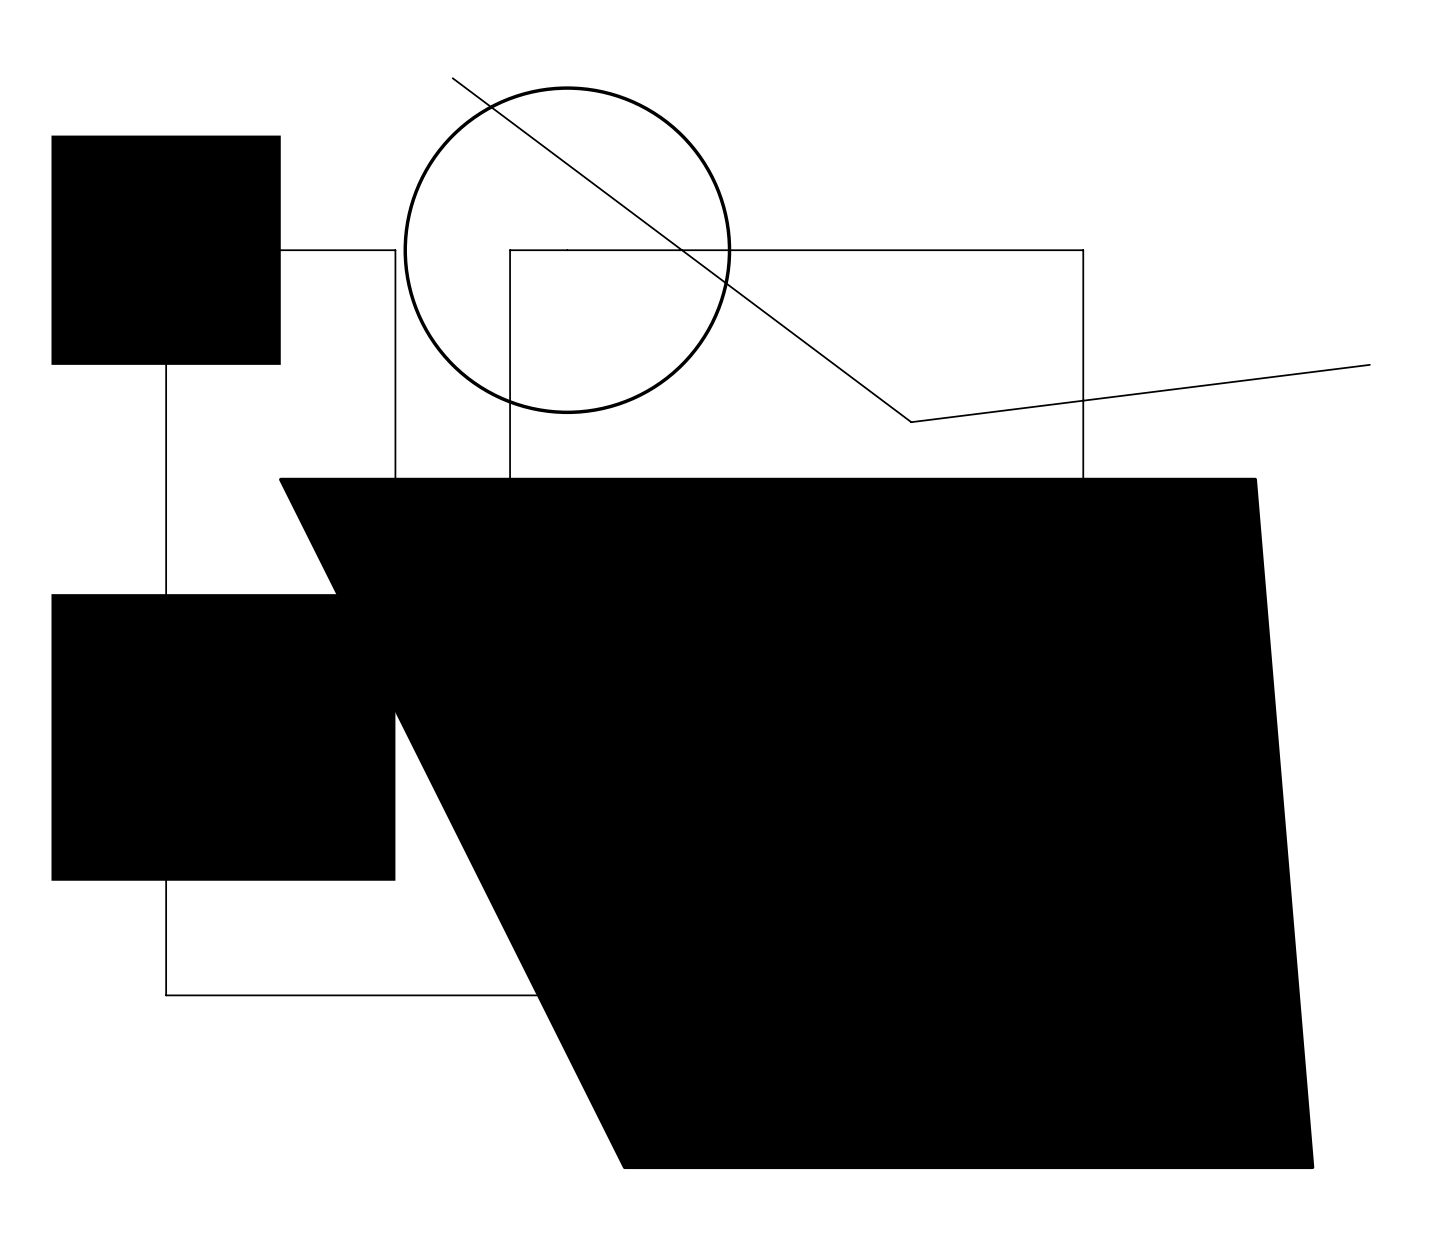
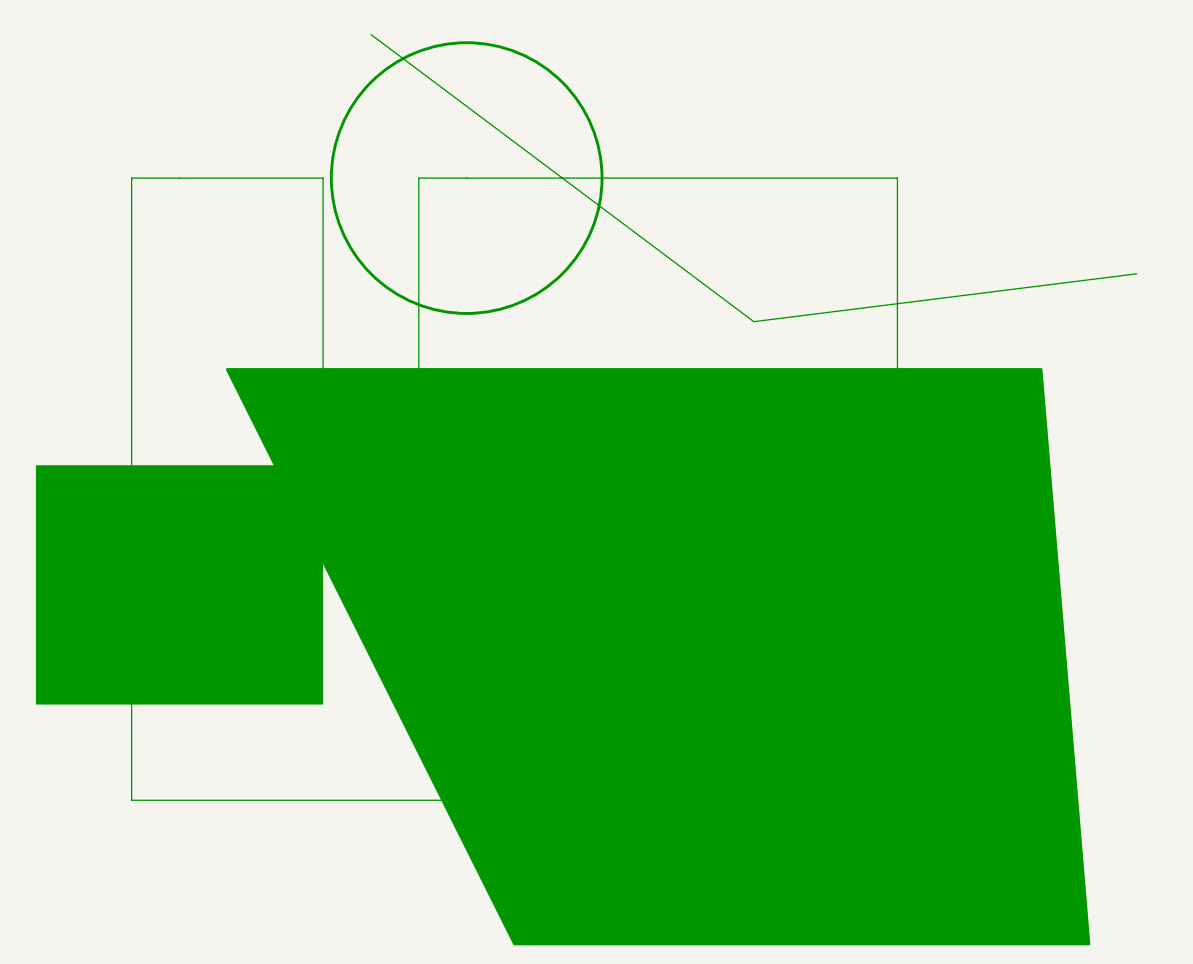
drawing: [51, 135, 281, 365] -> none

